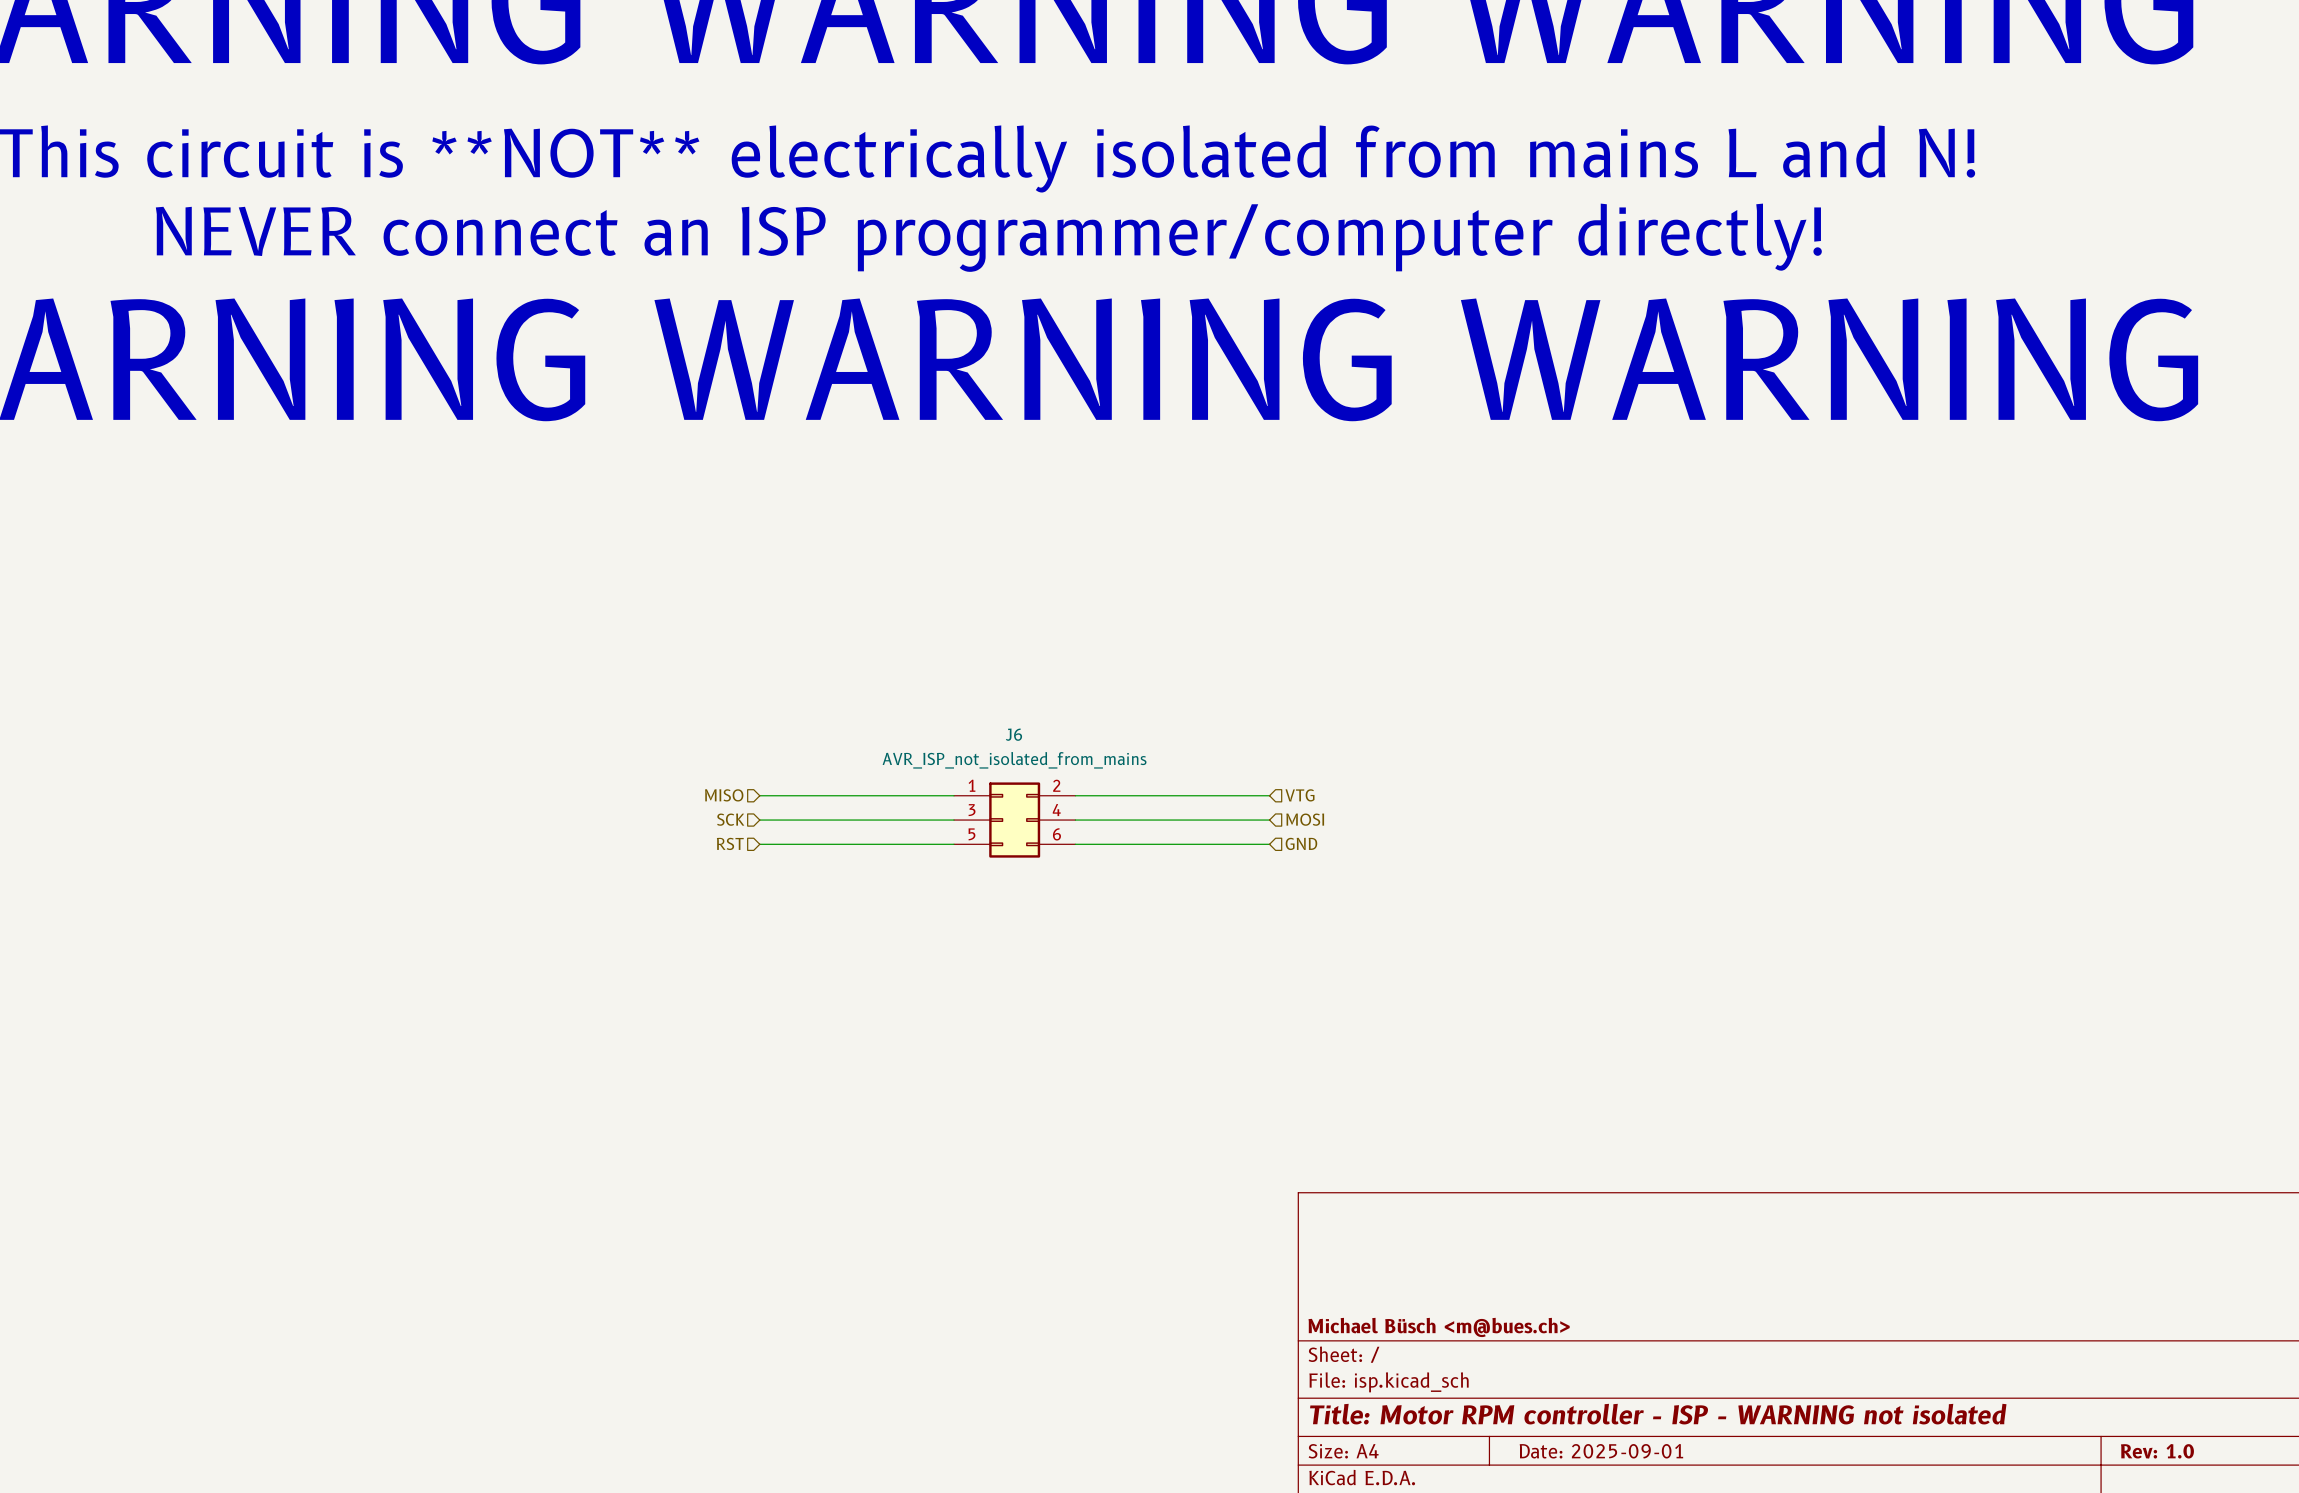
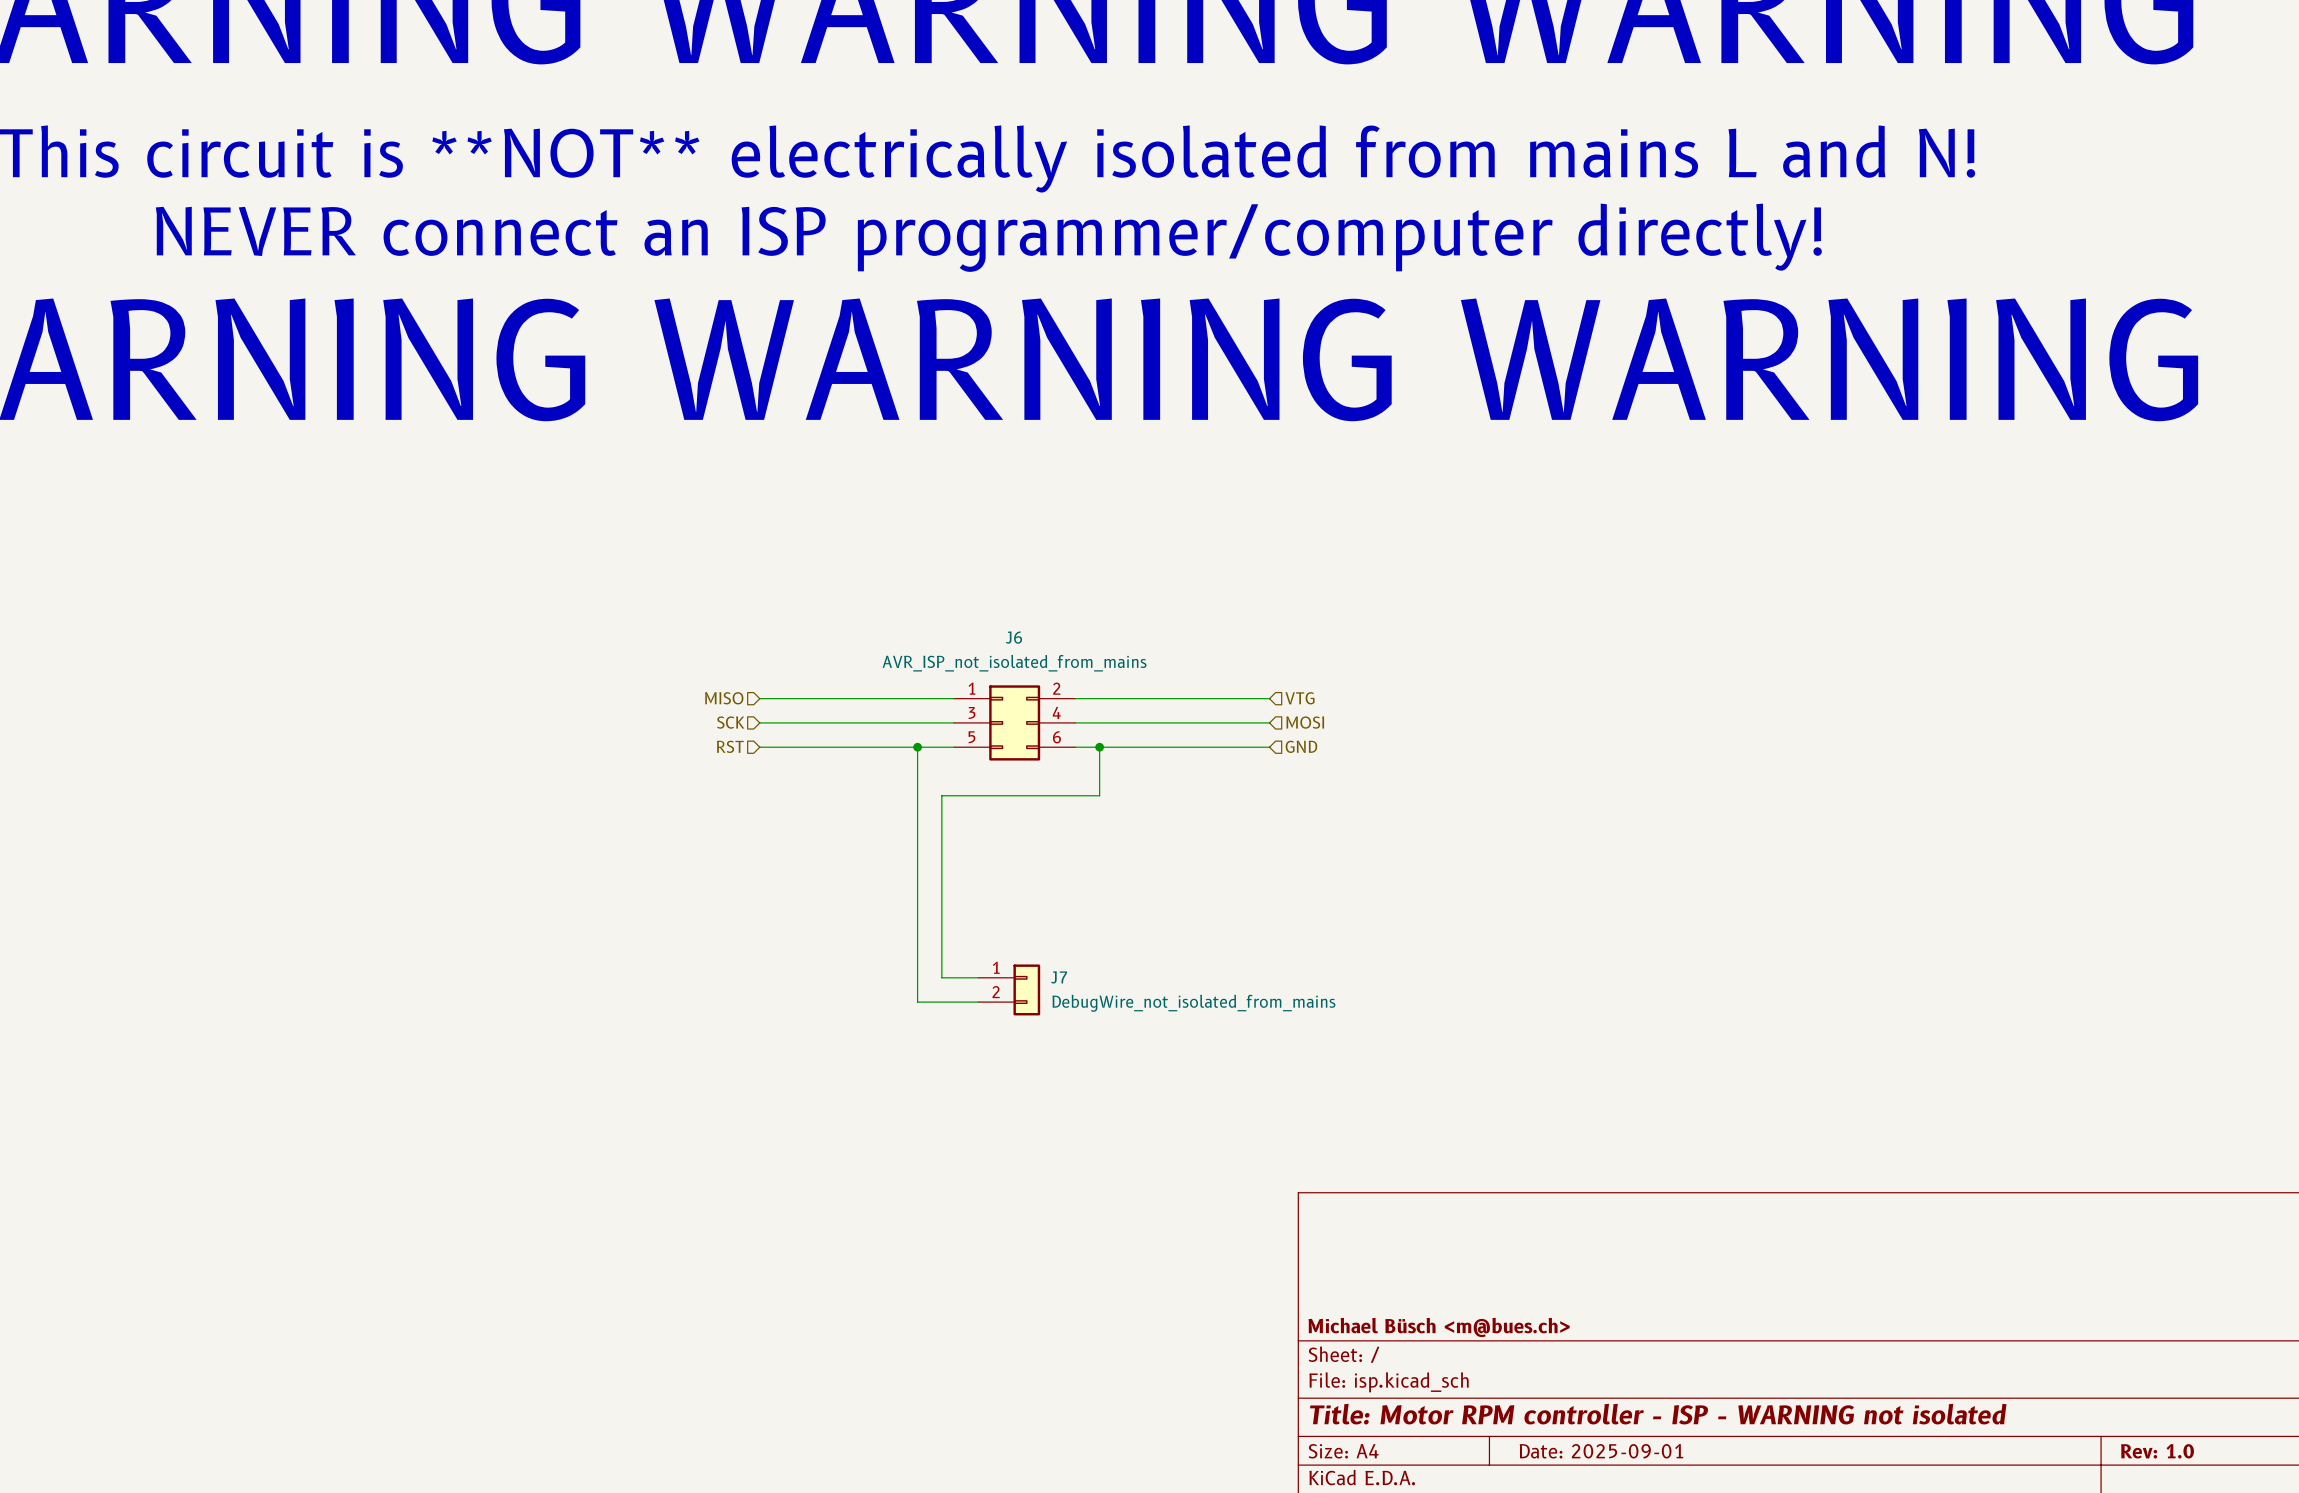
wire: none -> (759, 698) (953, 698)
wire: none -> (1075, 698) (1269, 698)
wire: none -> (917, 747) (917, 1002) (978, 1002)
junction: none -> (917, 747)
junction: none -> (1099, 747)
hierarchical label position: MISO (724, 795) -> MISO (724, 698)
wire: (759, 795) (941, 795) -> (978, 977) (941, 977) (941, 795)
wire: (1099, 795) (1269, 795) -> (1099, 795) (1099, 747)
hierarchical label position: VTG (1300, 795) -> VTG (1300, 698)
hierarchical label position: SCK (730, 819) -> SCK (730, 722)
hierarchical label position: MOSI (1305, 819) -> MOSI (1305, 722)
wire: (759, 820) (953, 820) -> (759, 722) (953, 722)
J6 position: (1014, 820) -> (1014, 722)
wire: (1075, 820) (1269, 820) -> (1075, 722) (1269, 722)
hierarchical label position: RST (730, 843) -> RST (730, 746)
hierarchical label position: GND (1301, 843) -> GND (1301, 746)
wire: (759, 844) (953, 844) -> (759, 747) (953, 747)
wire: (1075, 844) (1269, 844) -> (1075, 747) (1269, 747)
J7: none -> DebugWire_not_isolated_from_mains (1009, 989)

